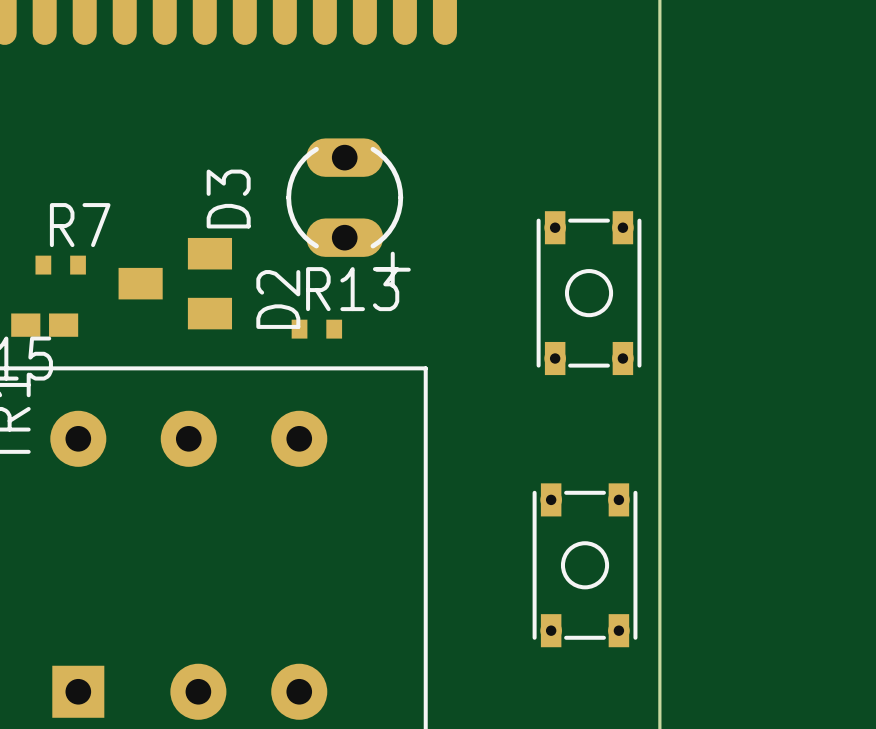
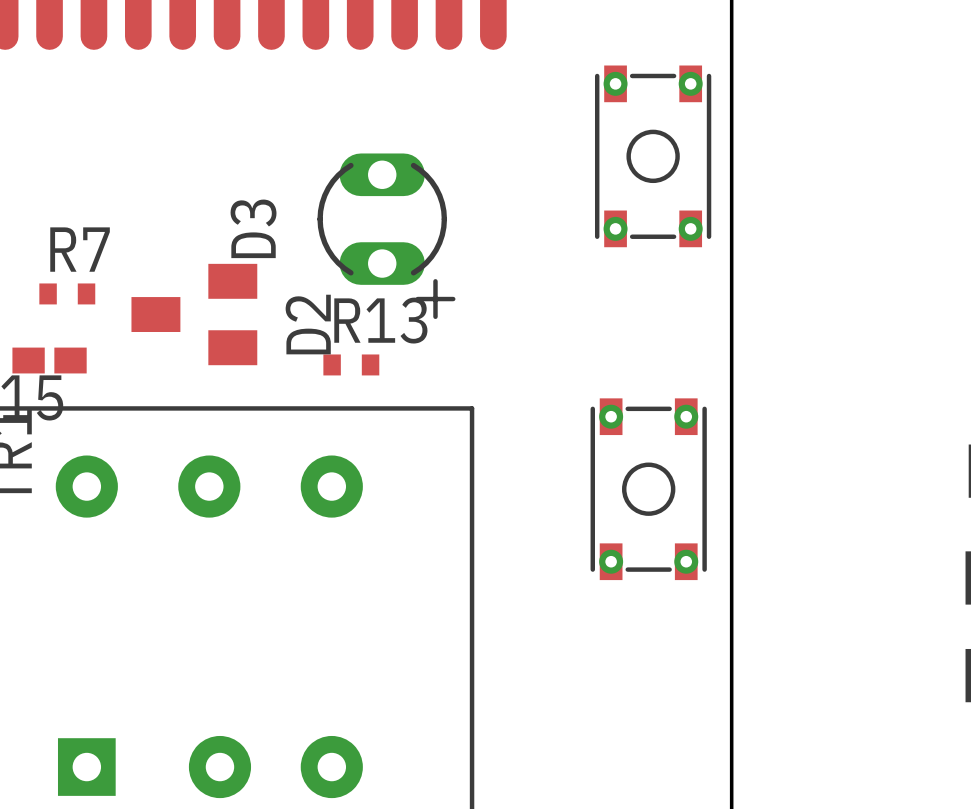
part: none -> (653, 156)
part: (589, 293) -> none
part: none -> (648, 489)
part: (585, 565) -> none

